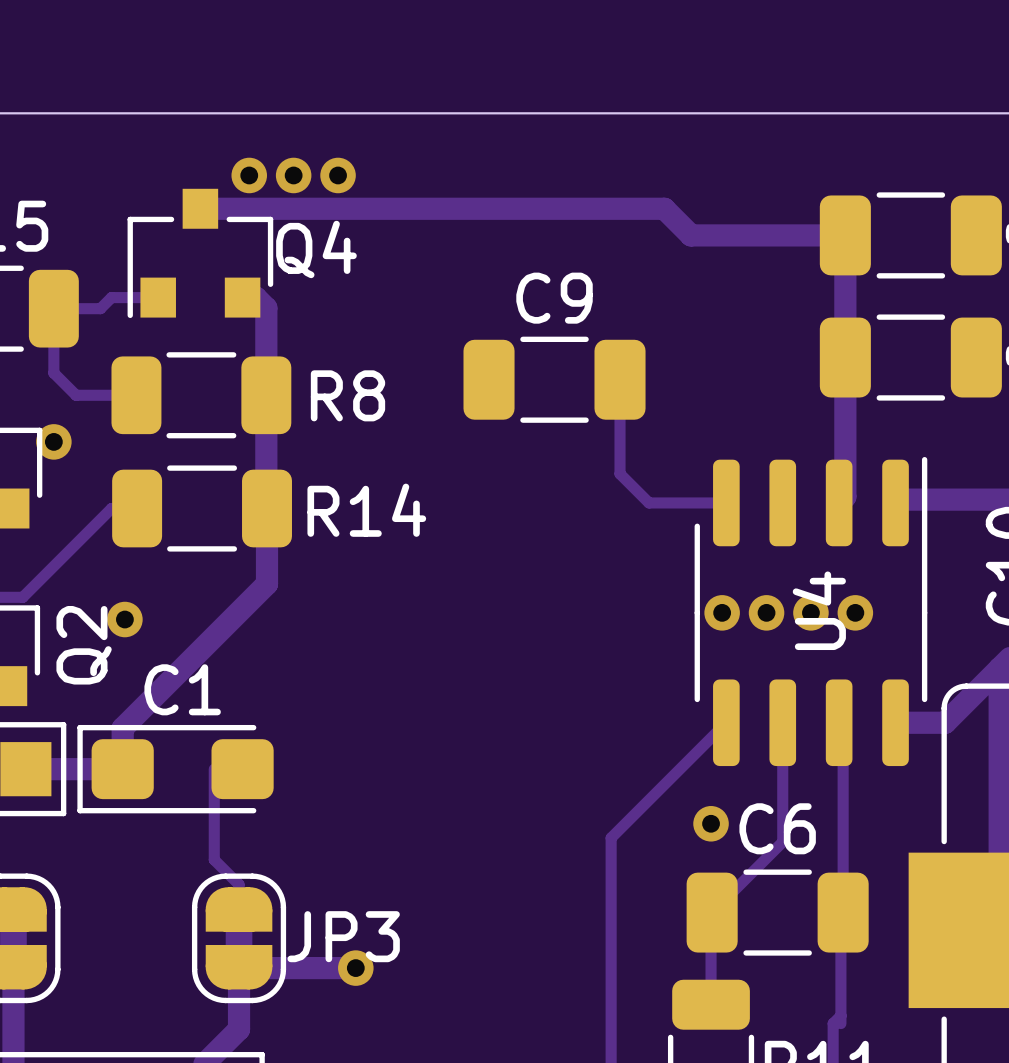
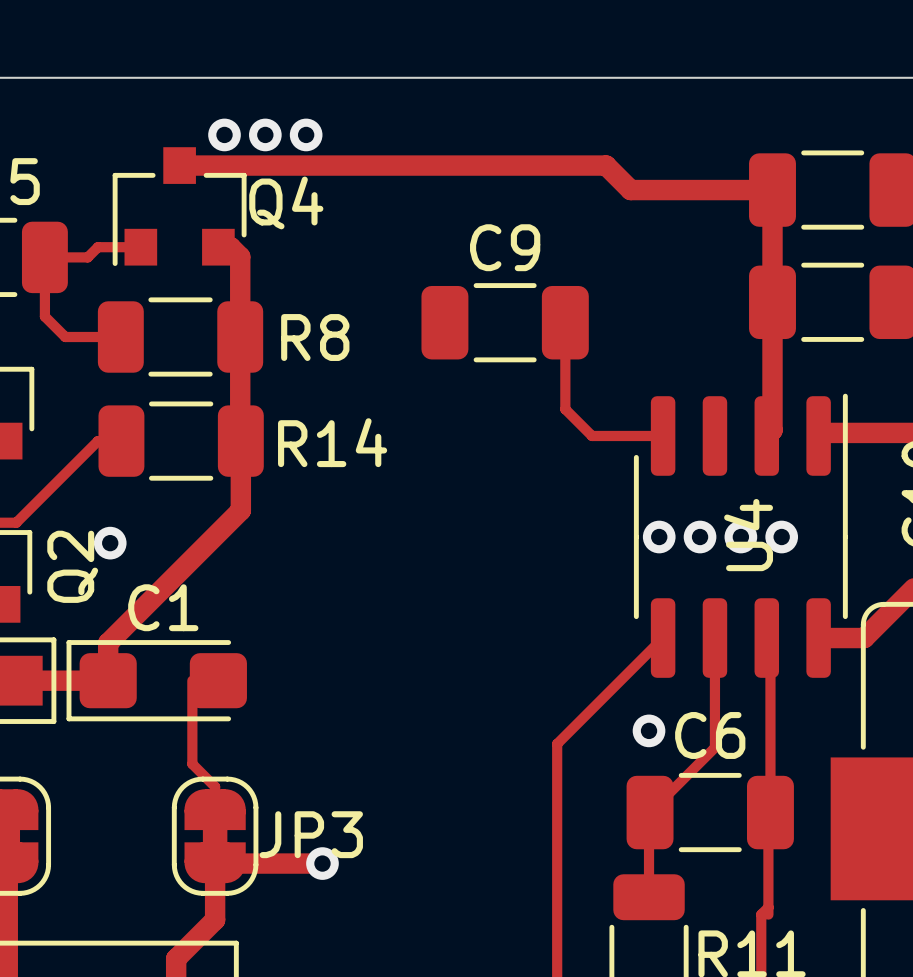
via: (53, 441) -> none

